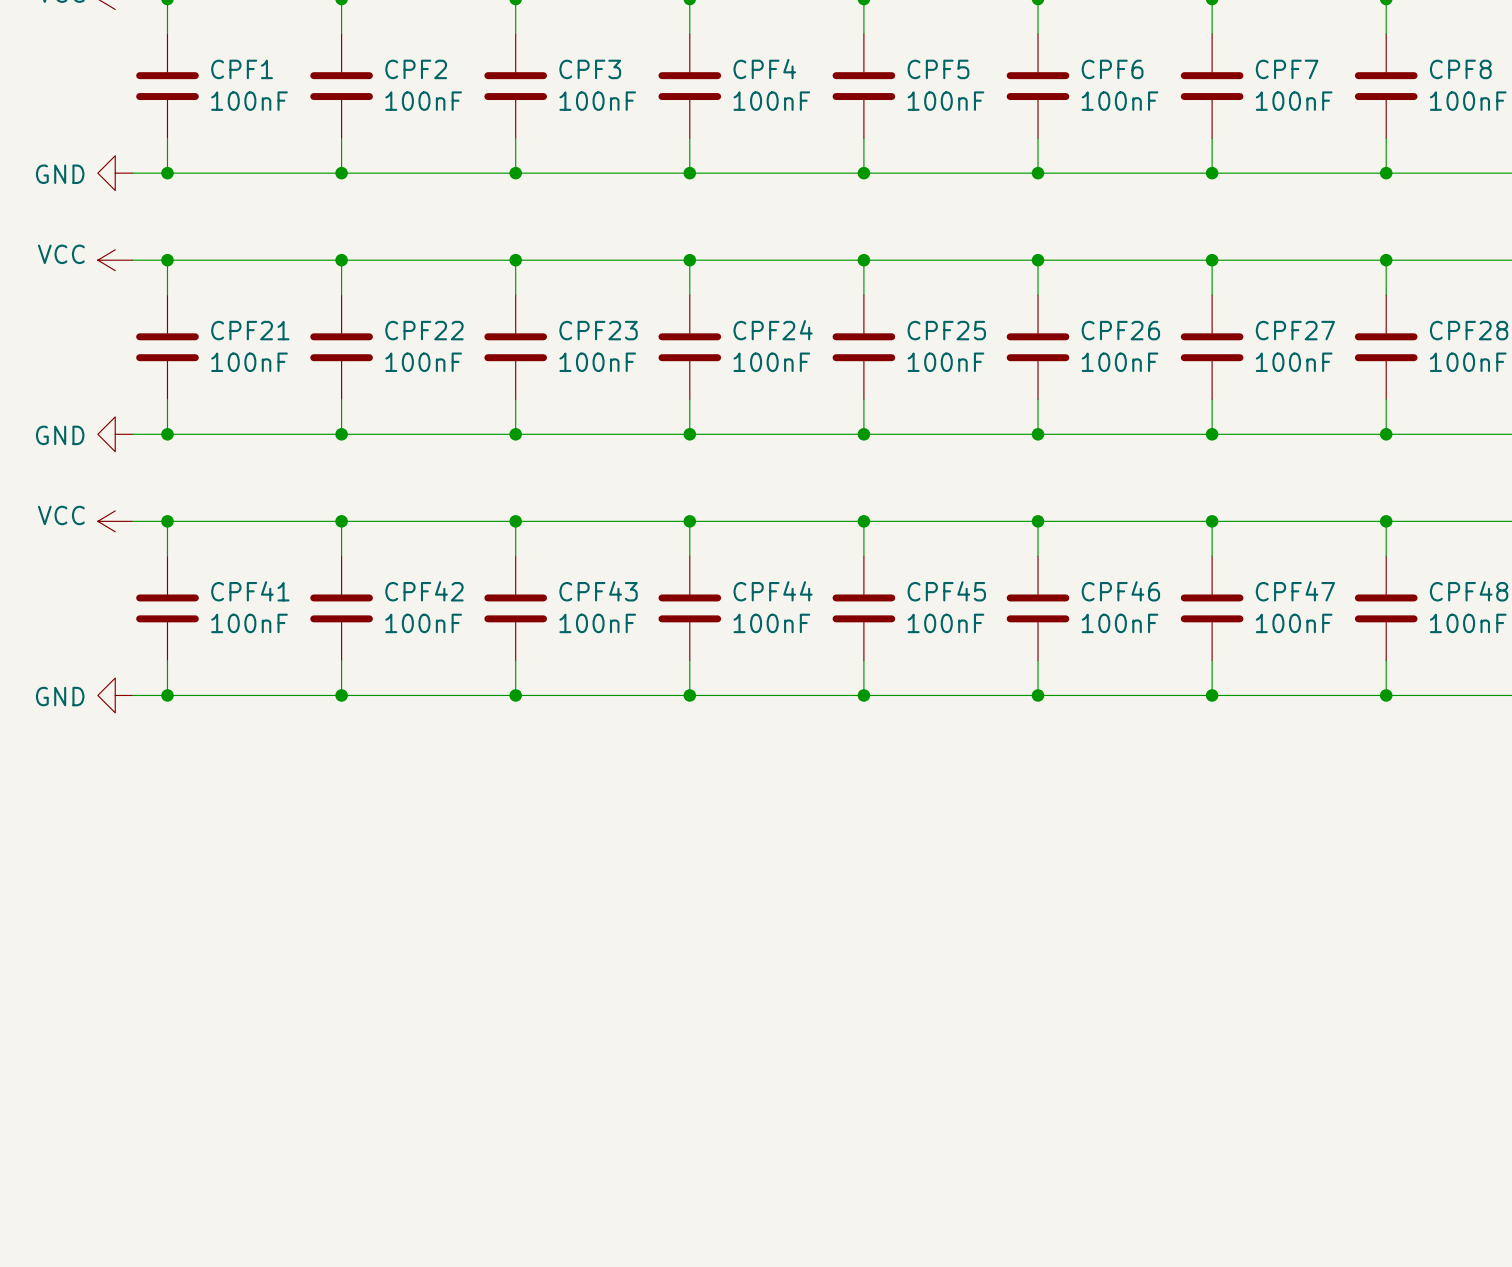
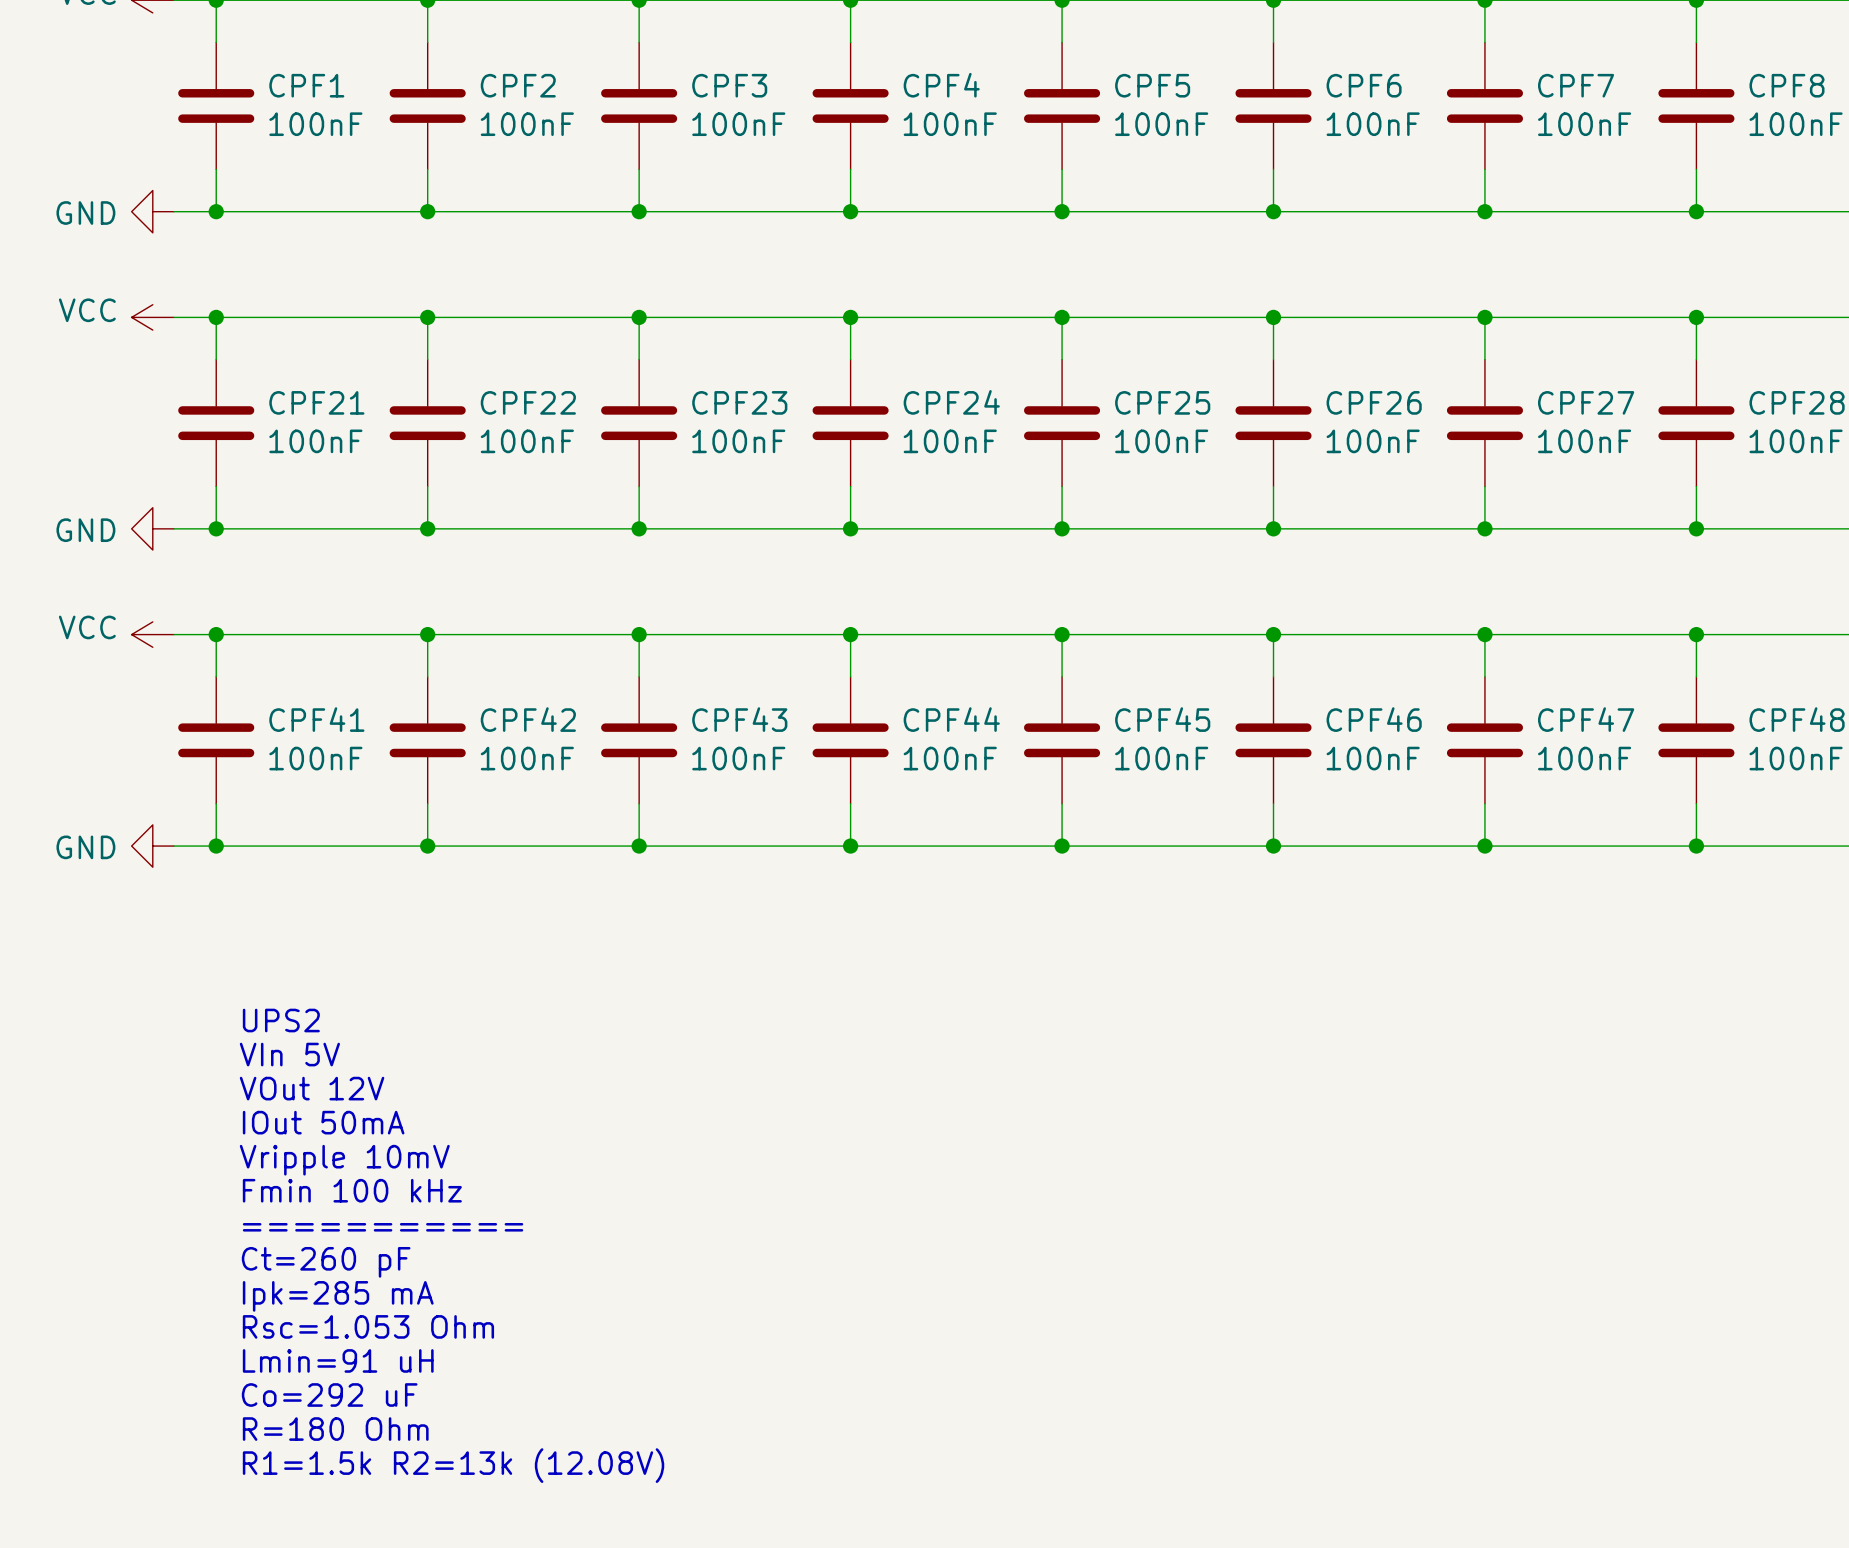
text: none -> UPS2 (281, 1020)
text: none -> VIn 5V (289, 1054)
text: none -> VOut 12V (312, 1088)
text: none -> IOut 50mA (323, 1122)
text: none -> Vripple 10mV (344, 1160)
text: none -> Fmin 100 kHz (352, 1190)
text: none -> =========== (383, 1227)
text: none -> Ct=260 pF (326, 1262)
text: none -> Ipk=285 mA (338, 1296)
text: none -> Rsc=1.053 Ohm (368, 1326)
text: none -> Lmin=91 uH (338, 1360)
text: none -> Co=292 uF (329, 1394)
text: none -> R=180 Ohm (335, 1429)
text: none -> R1=1.5k R2=13k (12.08V) (453, 1465)

